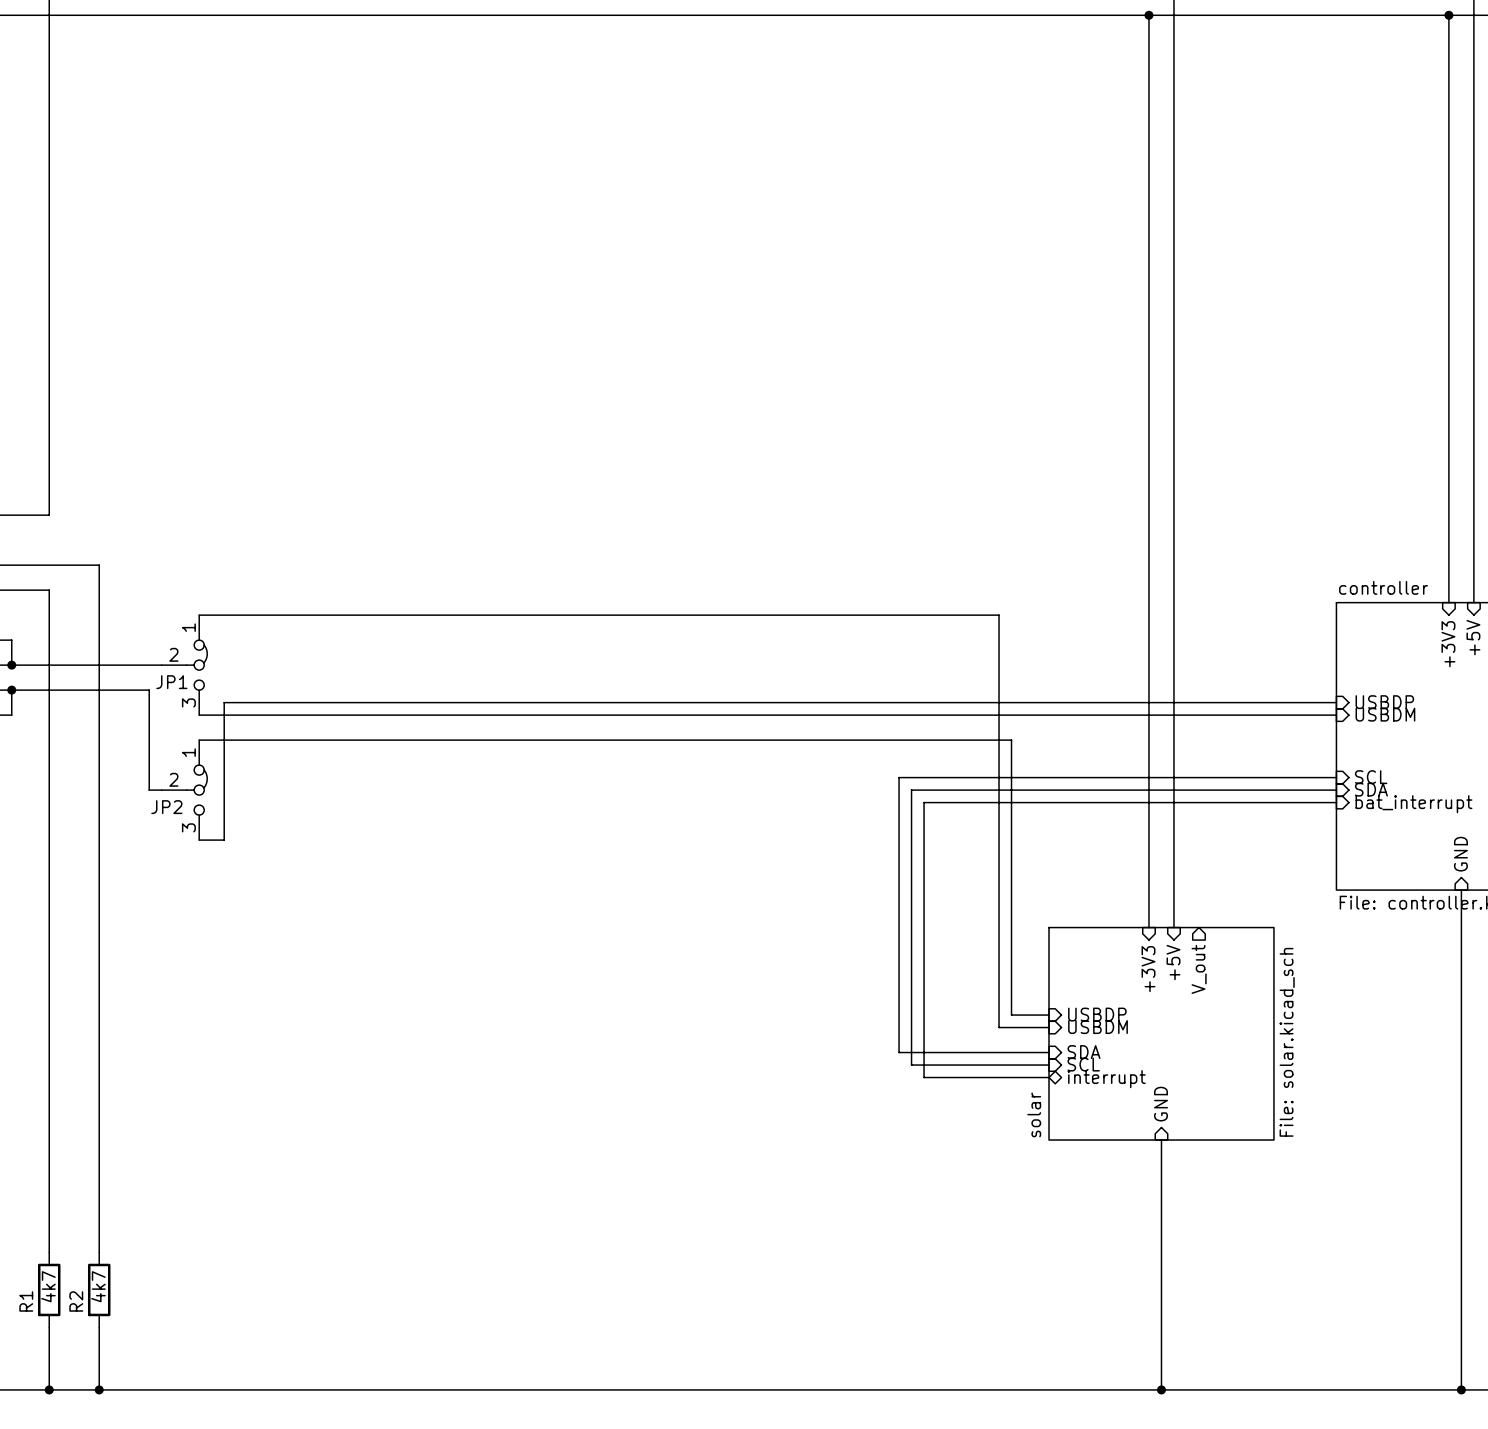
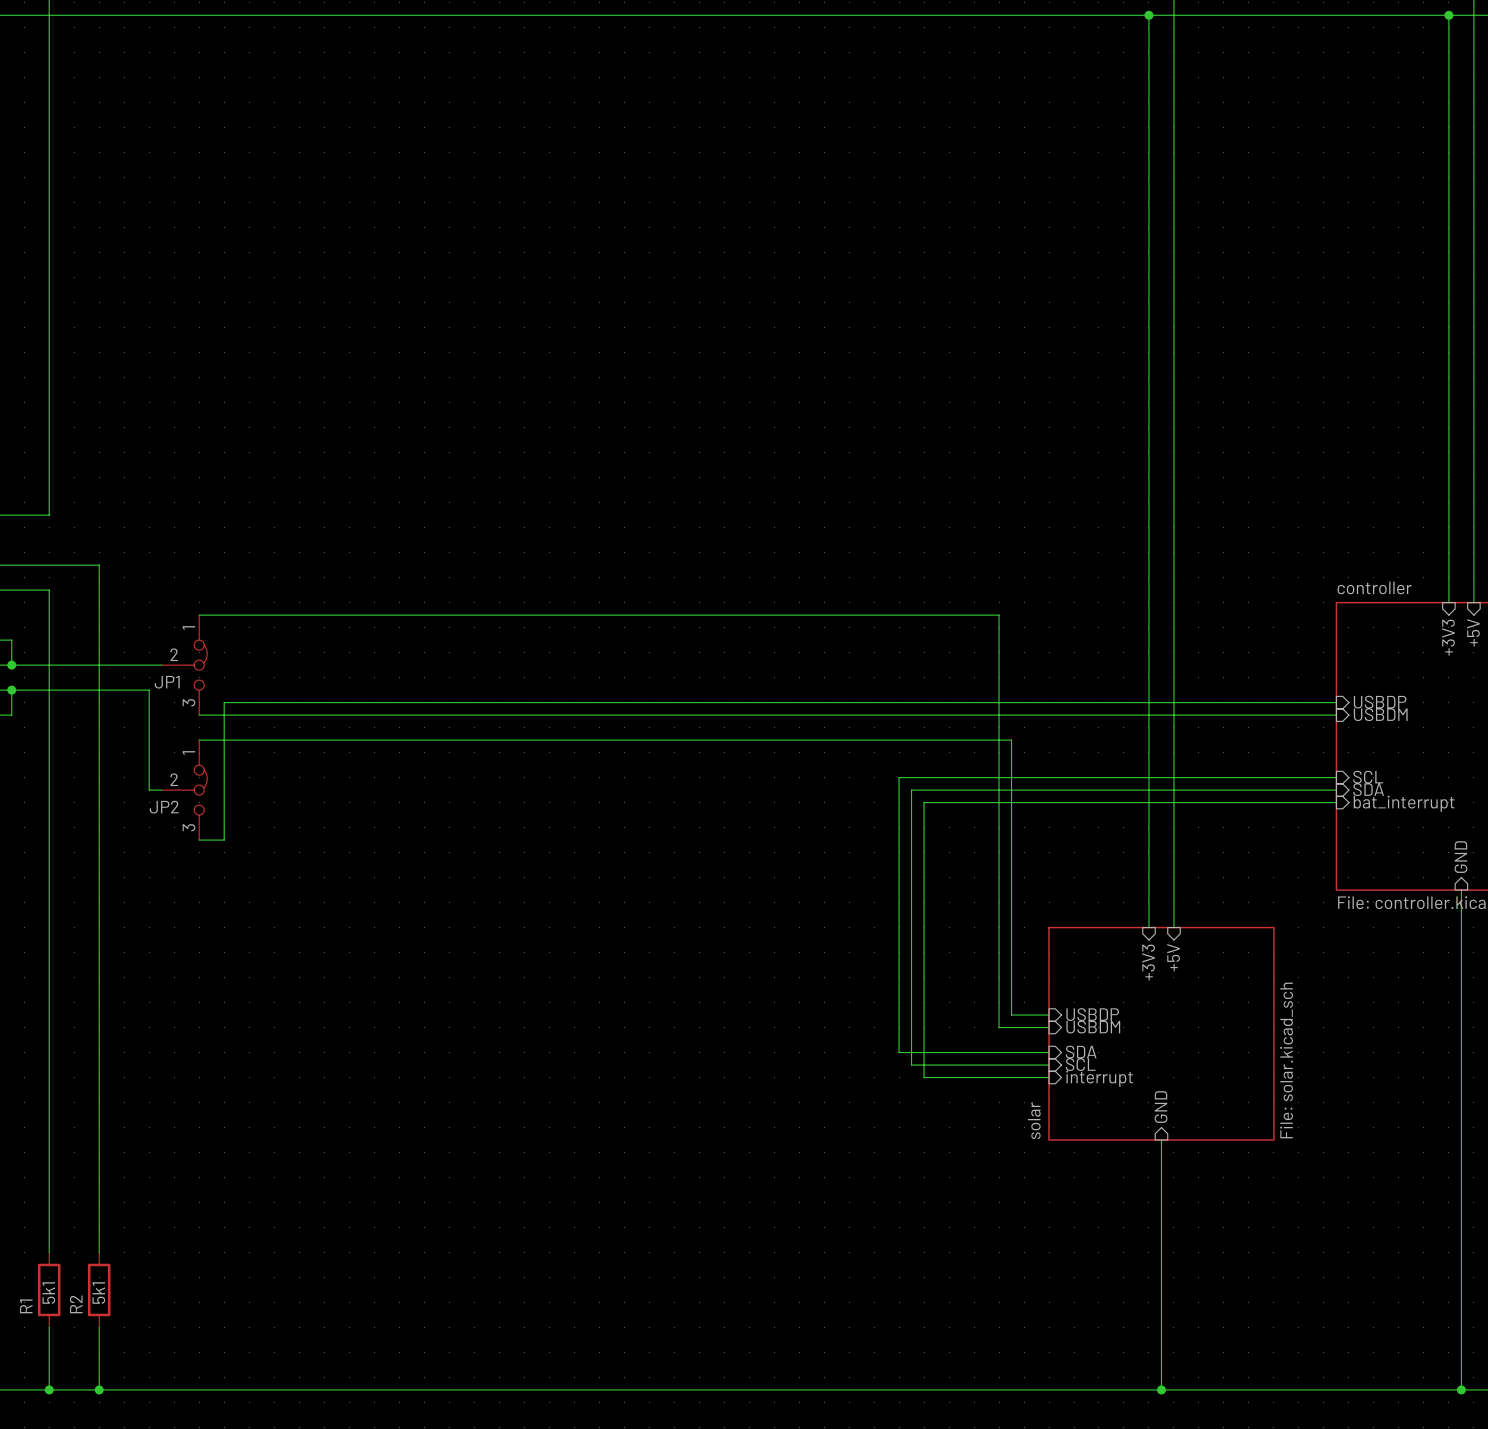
sheet pin: V_out (1199, 969) -> none
sheet pin shape: bidirectional (1106, 1079) -> input (1099, 1078)
R1 value: 4k7 (48, 1286) -> 5k1 (48, 1293)
R2 value: 4k7 (98, 1286) -> 5k1 (98, 1293)

